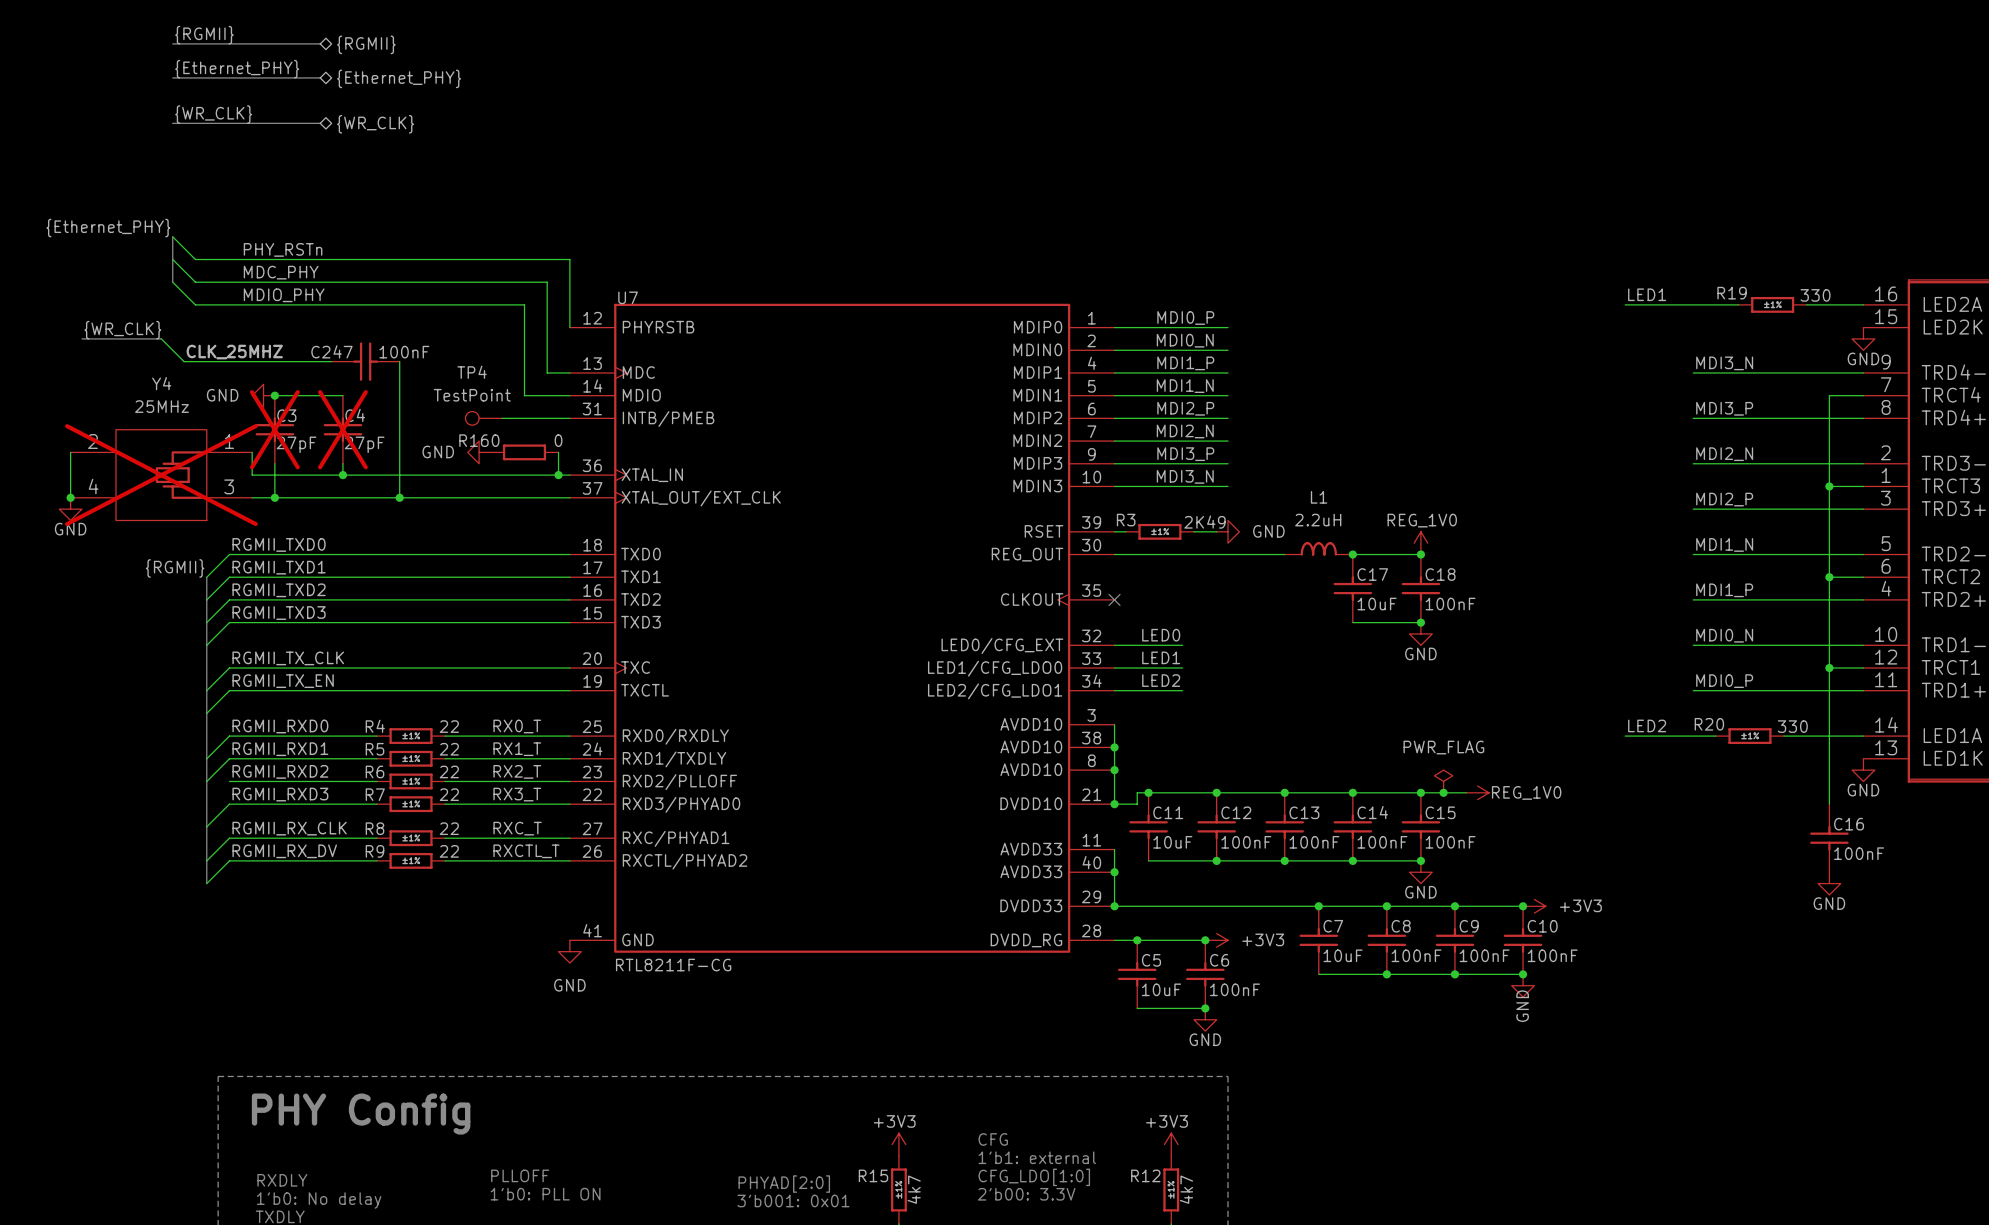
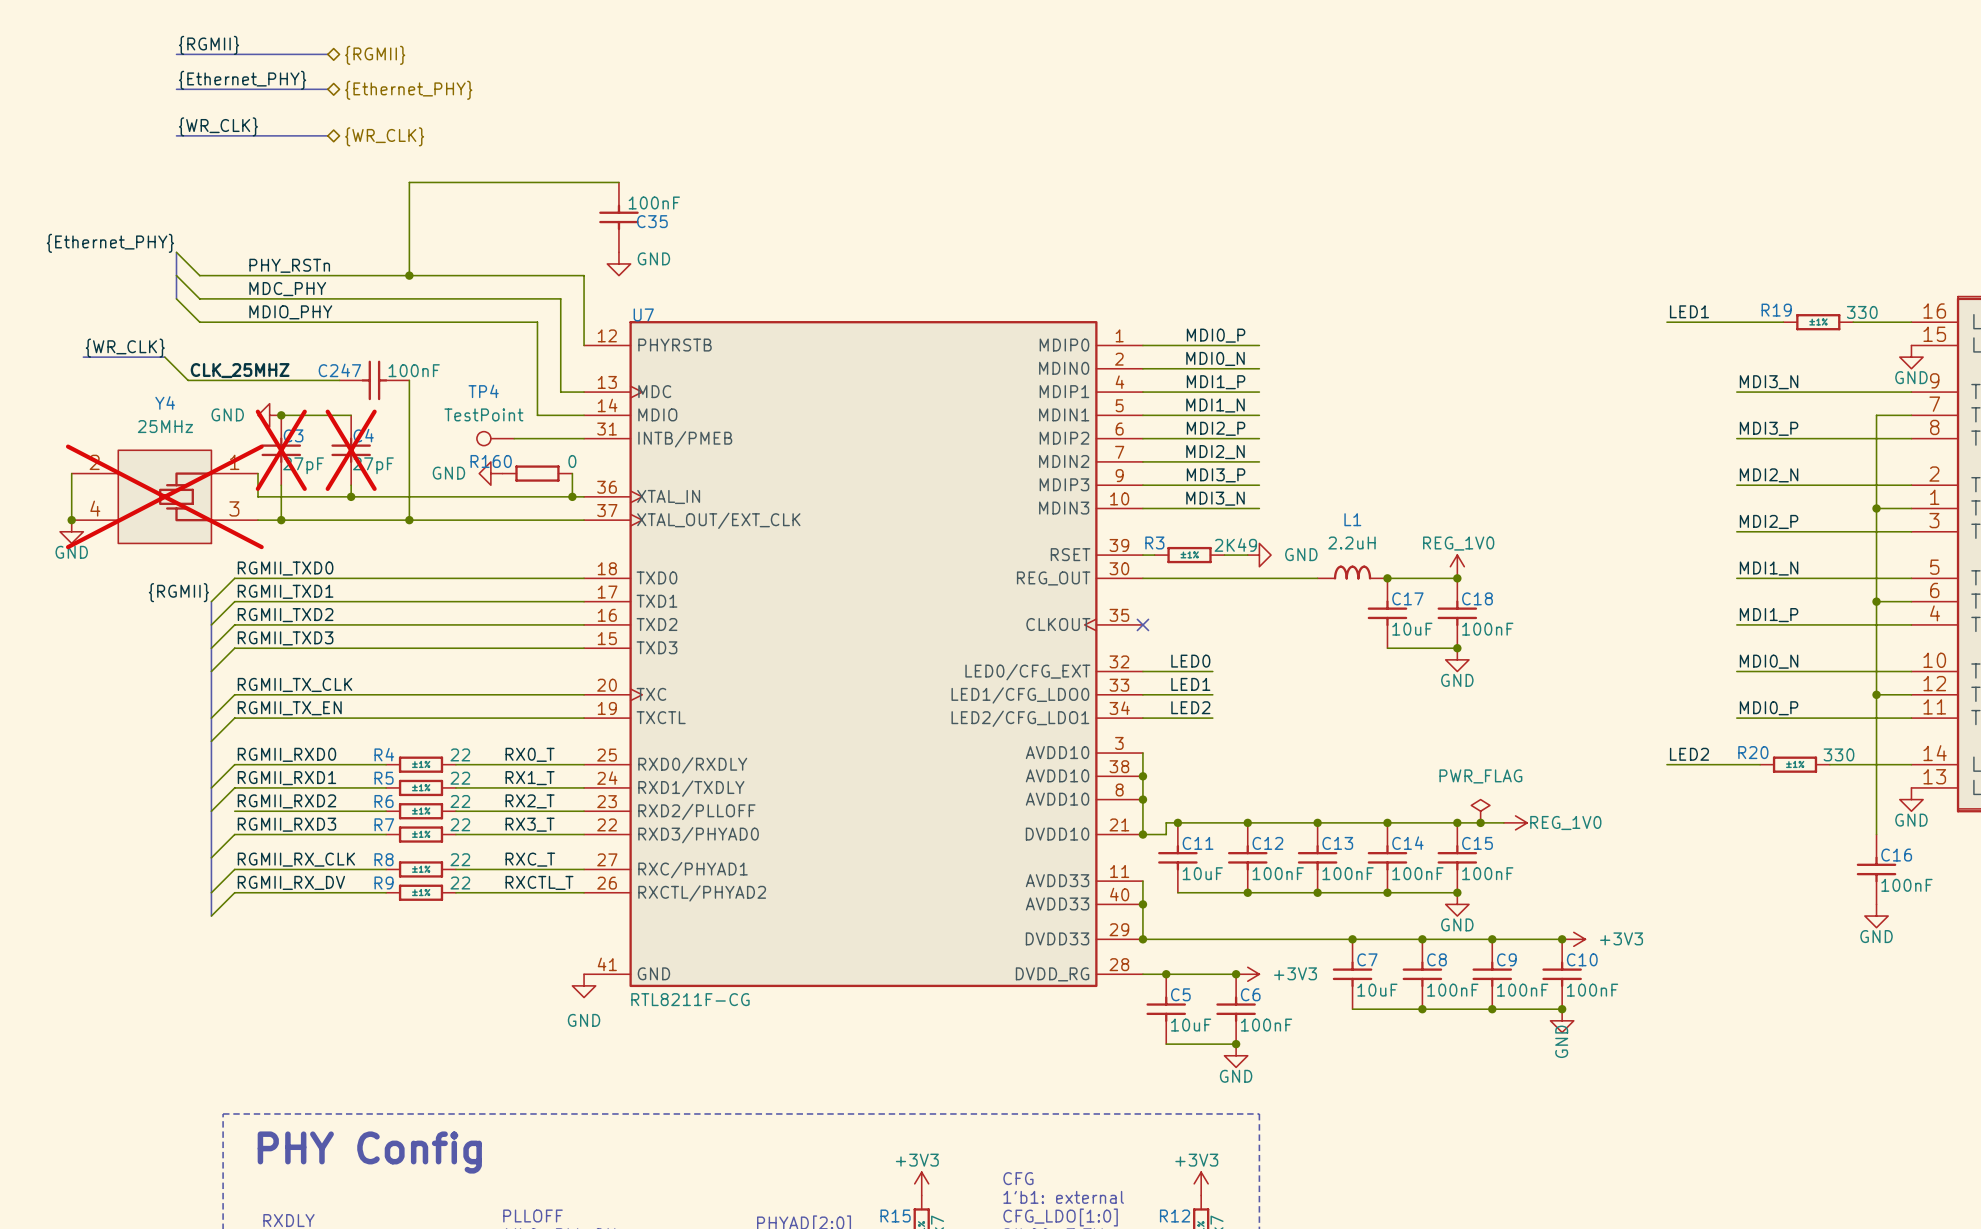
wire: none -> (618, 182) (409, 182) (409, 275)
C35: none -> (618, 217)
power symbol: none -> GND (618, 263)
junction: none -> (409, 275)

